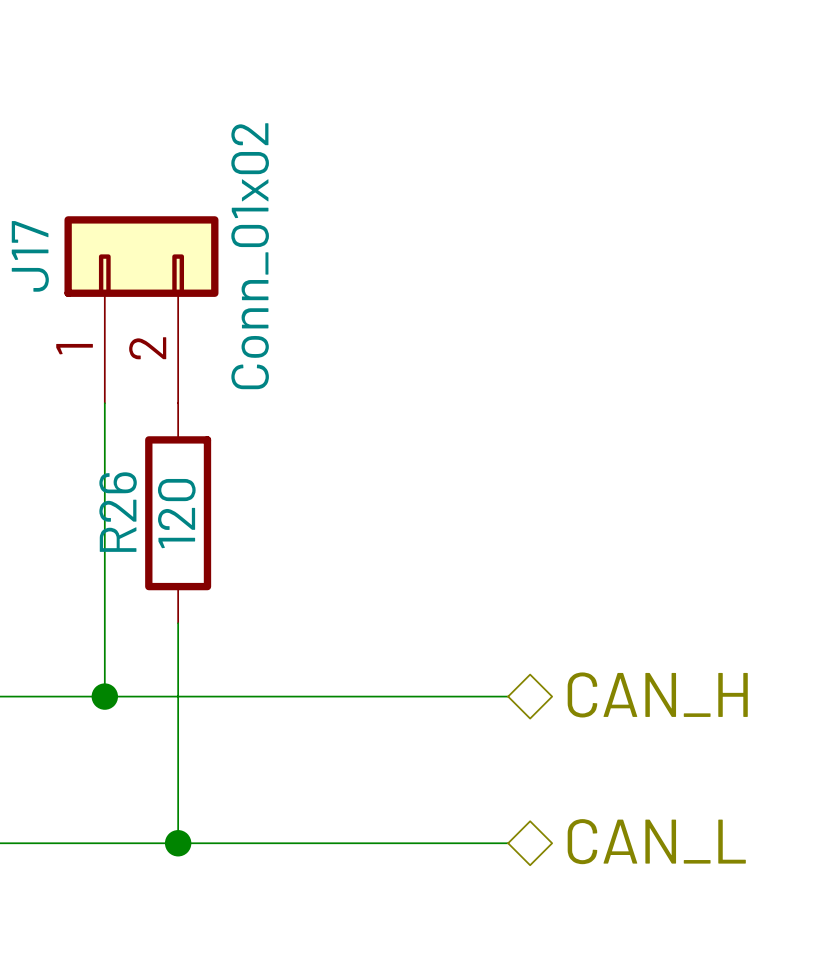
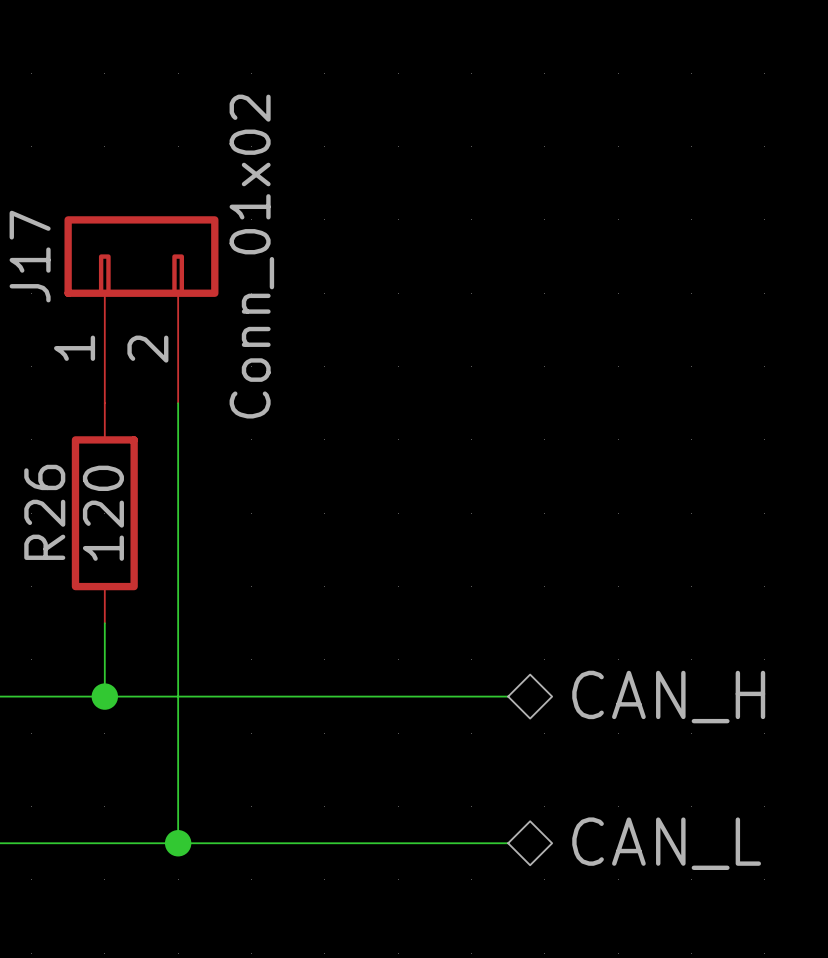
wire: (104, 403) (104, 623) -> (178, 403) (178, 623)
R26 position: (178, 513) -> (104, 513)

